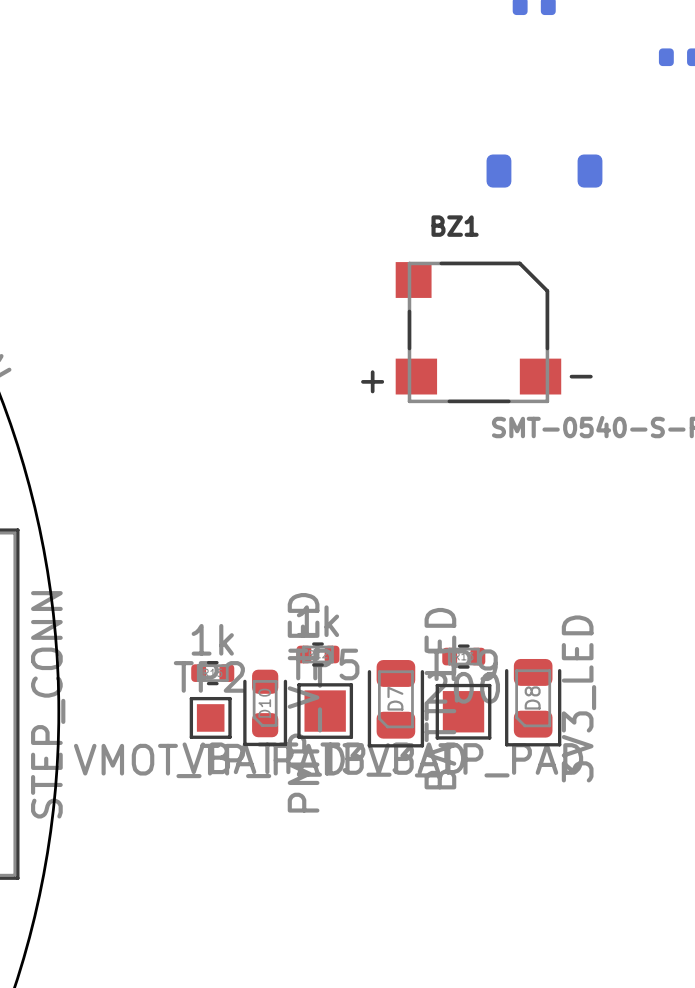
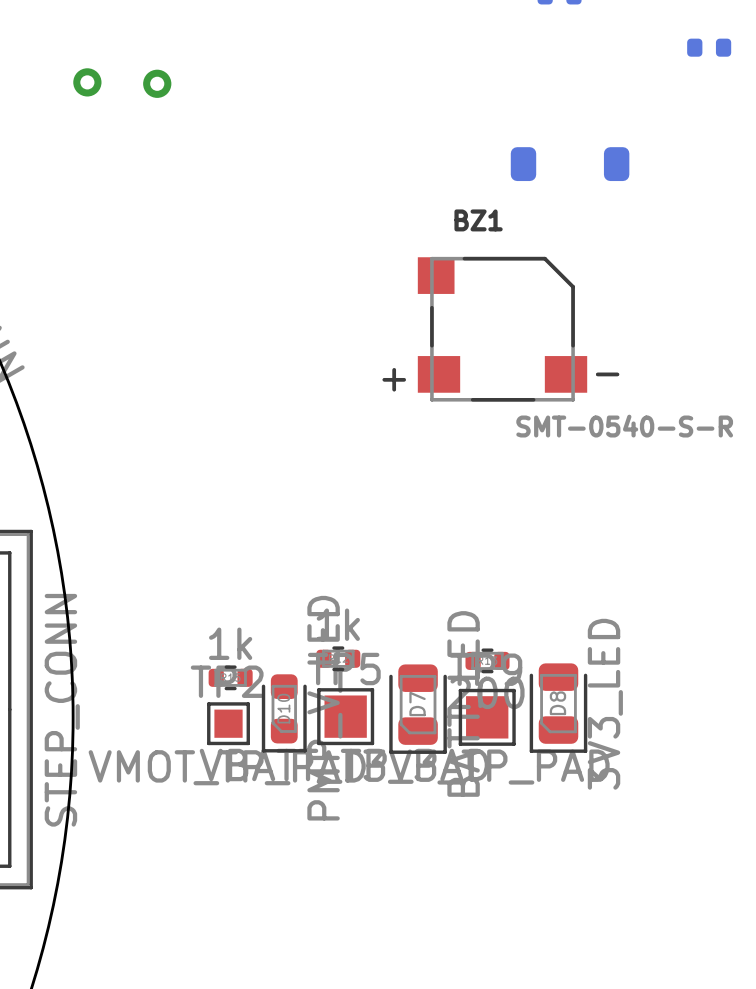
part: none -> (87, 82)
part: none -> (157, 83)

